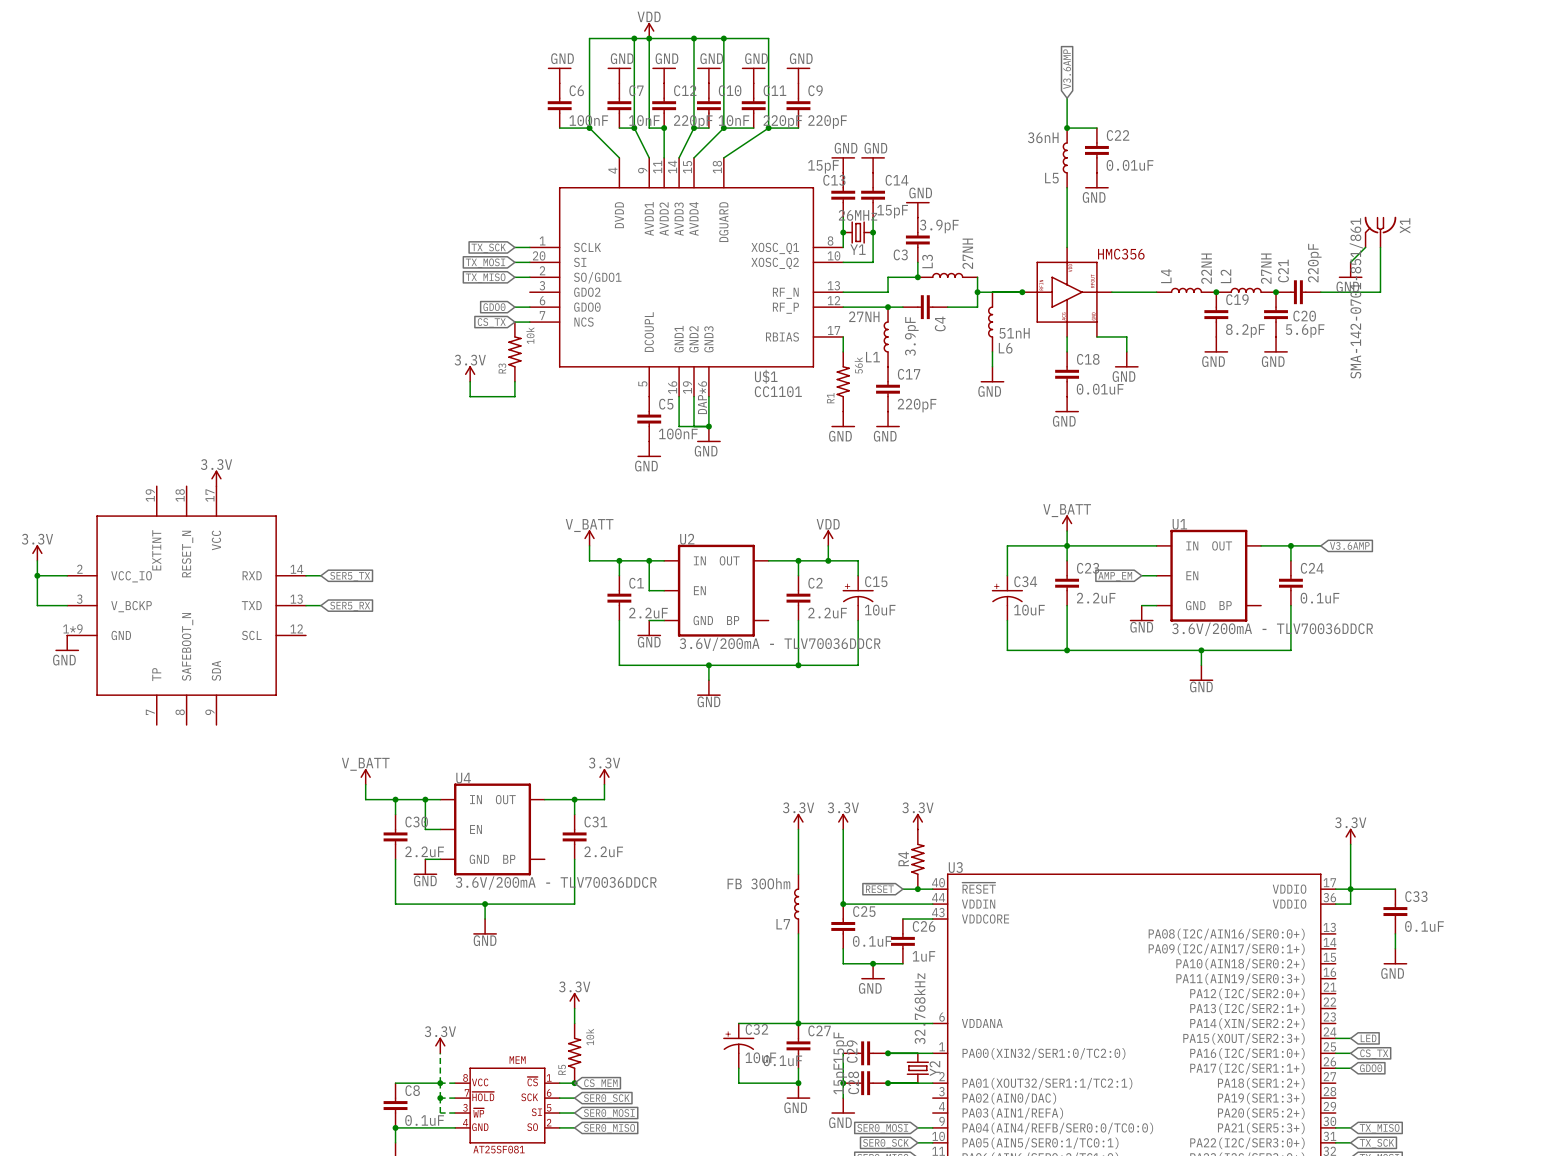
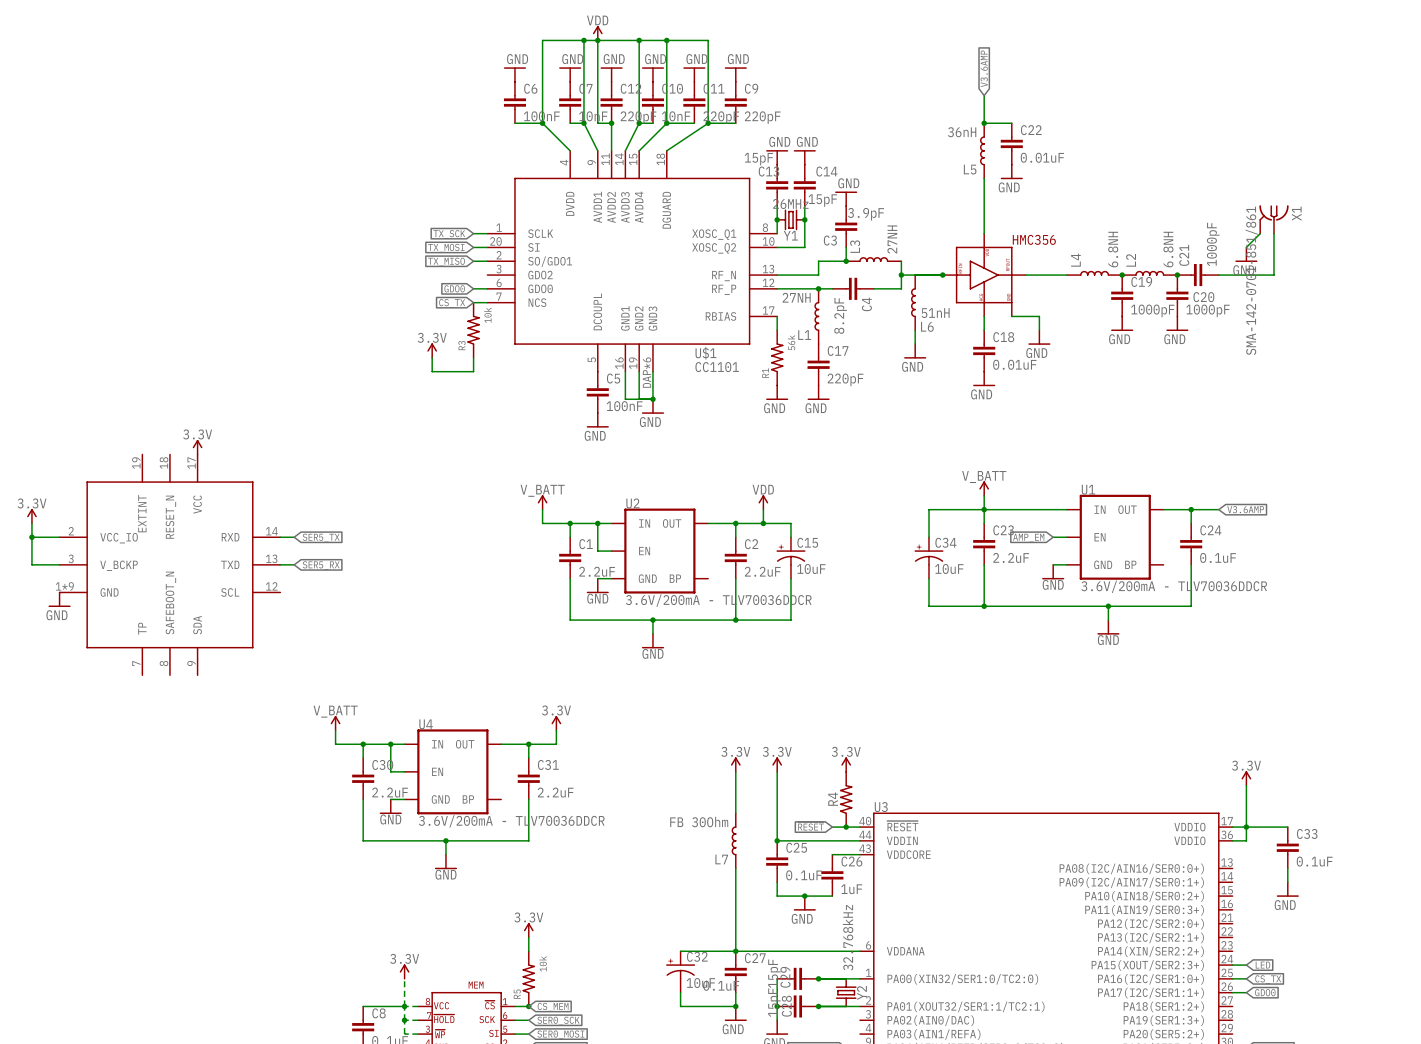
C21 value: 220pF (1314, 263) -> 1000pF (1213, 244)
L4 value: 22NH (1206, 268) -> 6.8NH (1113, 249)
L2 value: 27NH (1266, 268) -> 6.8NH (1168, 249)
C19 value: 8.2pF (1245, 330) -> 1000pF (1152, 310)
C20 value: 5.6pF (1305, 331) -> 1000pF (1207, 310)
C4 value: 3.9pF (911, 336) -> 8.2pF (840, 315)

